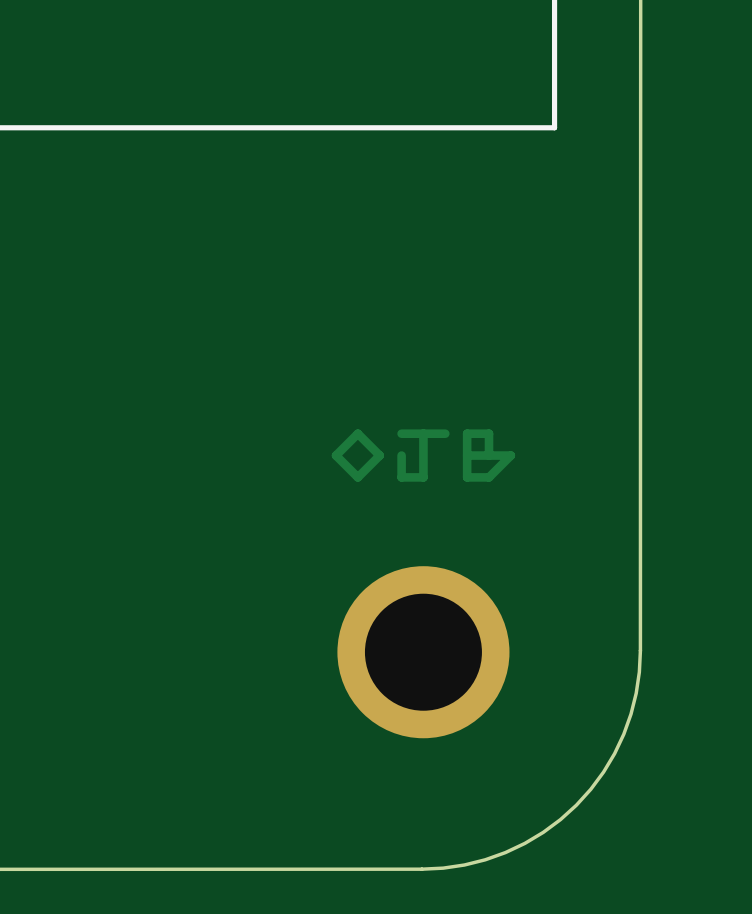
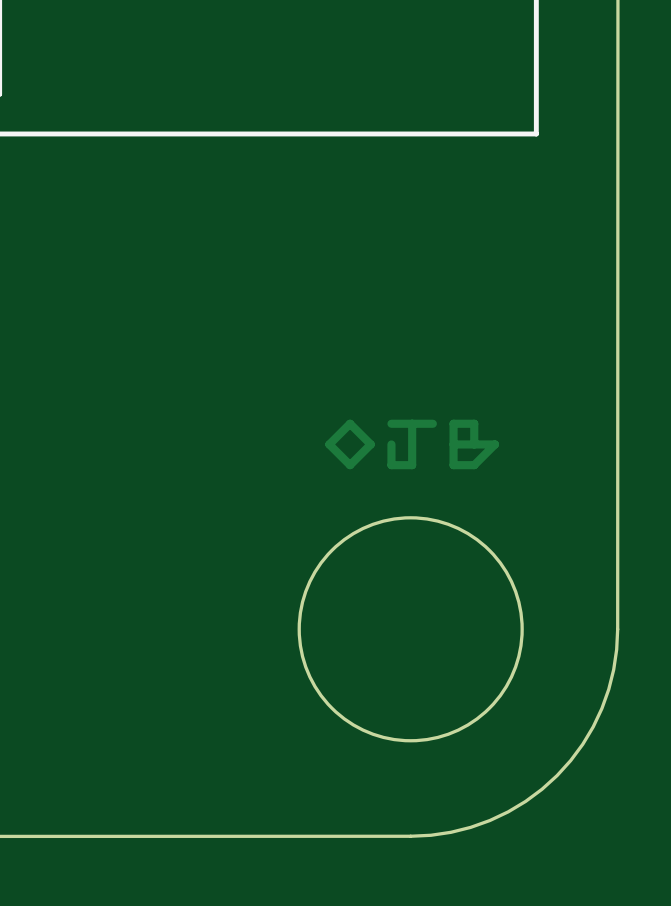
round board edge: none -> [297, 516, 524, 743]
via: (423, 652) -> none

